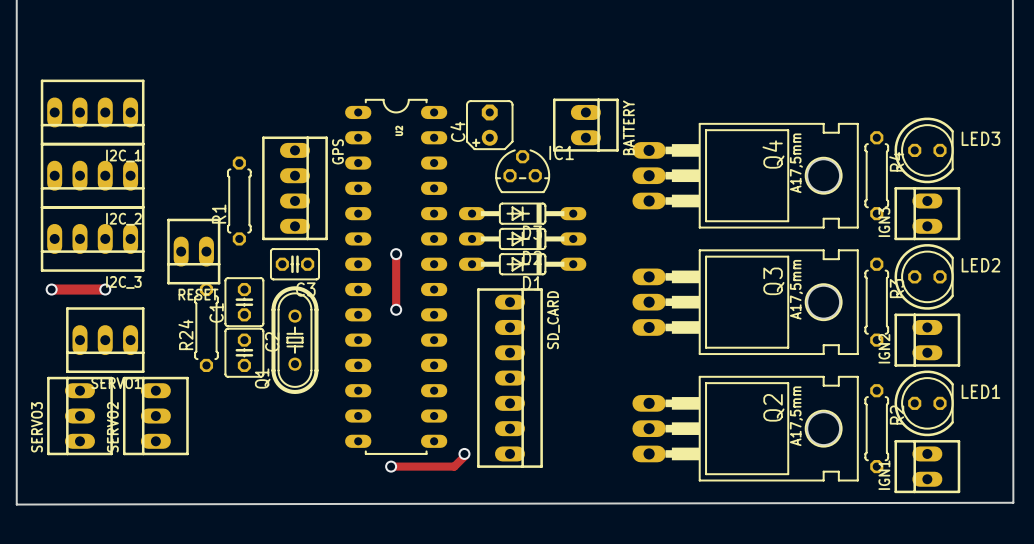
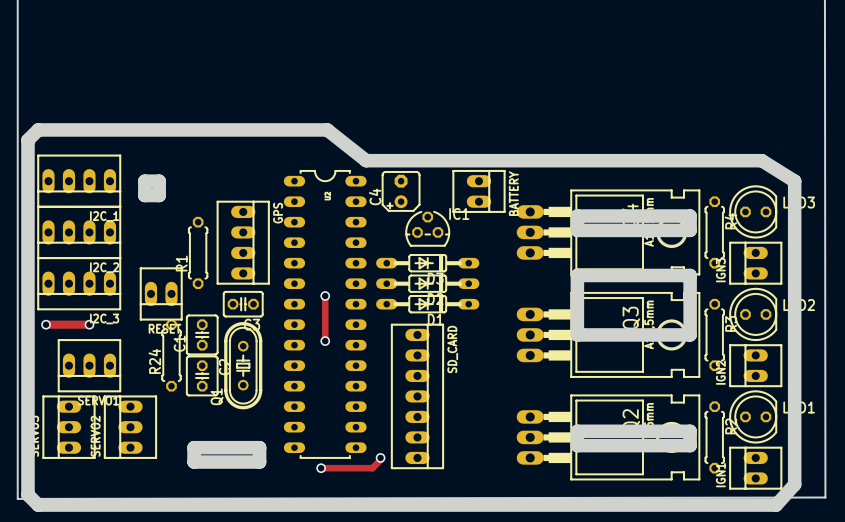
board edge: none -> (38, 129) (327, 129) (366, 160) (761, 160) (794, 181) (794, 484) (776, 505) (38, 505) (27, 494) (27, 140) (38, 129)
board edge: none -> (144, 181) (159, 181) (159, 195) (144, 195) (144, 181)
board edge: none -> (577, 216) (690, 216) (690, 230) (577, 230) (577, 216)
board edge: none -> (577, 275) (577, 334) (690, 334) (690, 275) (577, 275)
board edge: none -> (577, 431) (577, 445) (690, 445) (690, 431) (577, 431)
board edge: none -> (194, 447) (259, 447) (259, 462) (194, 462) (194, 447)

